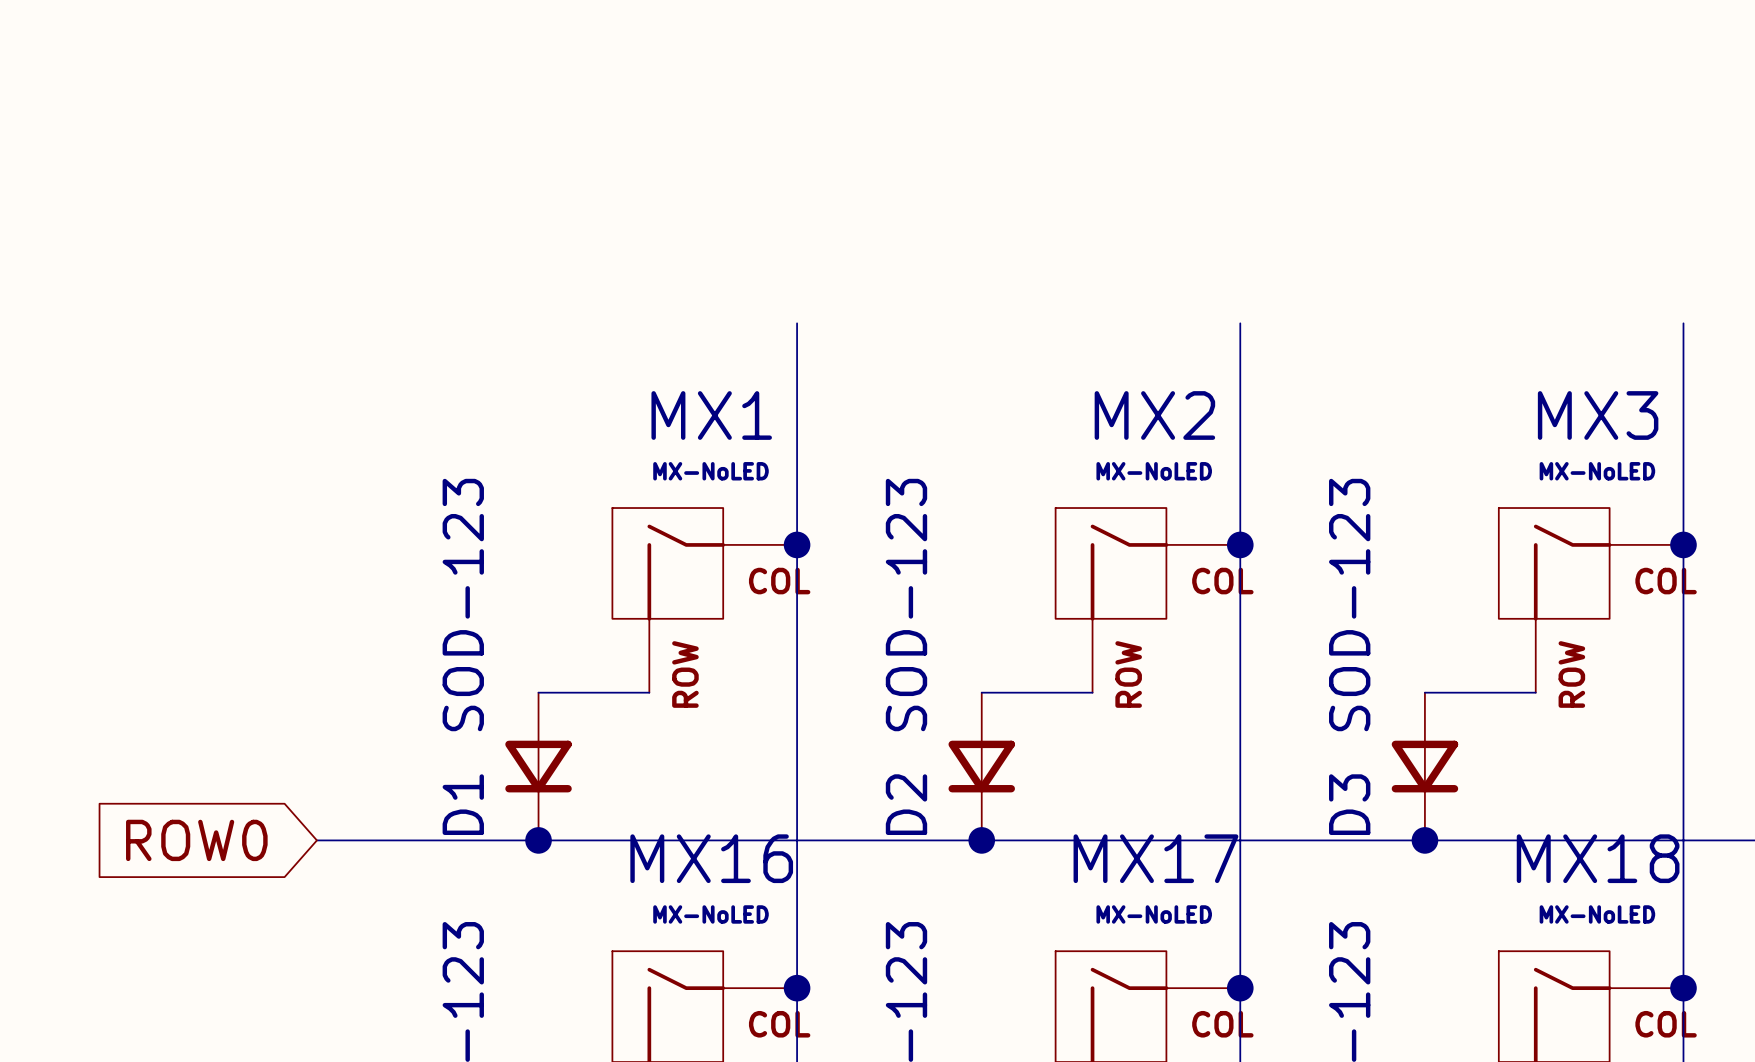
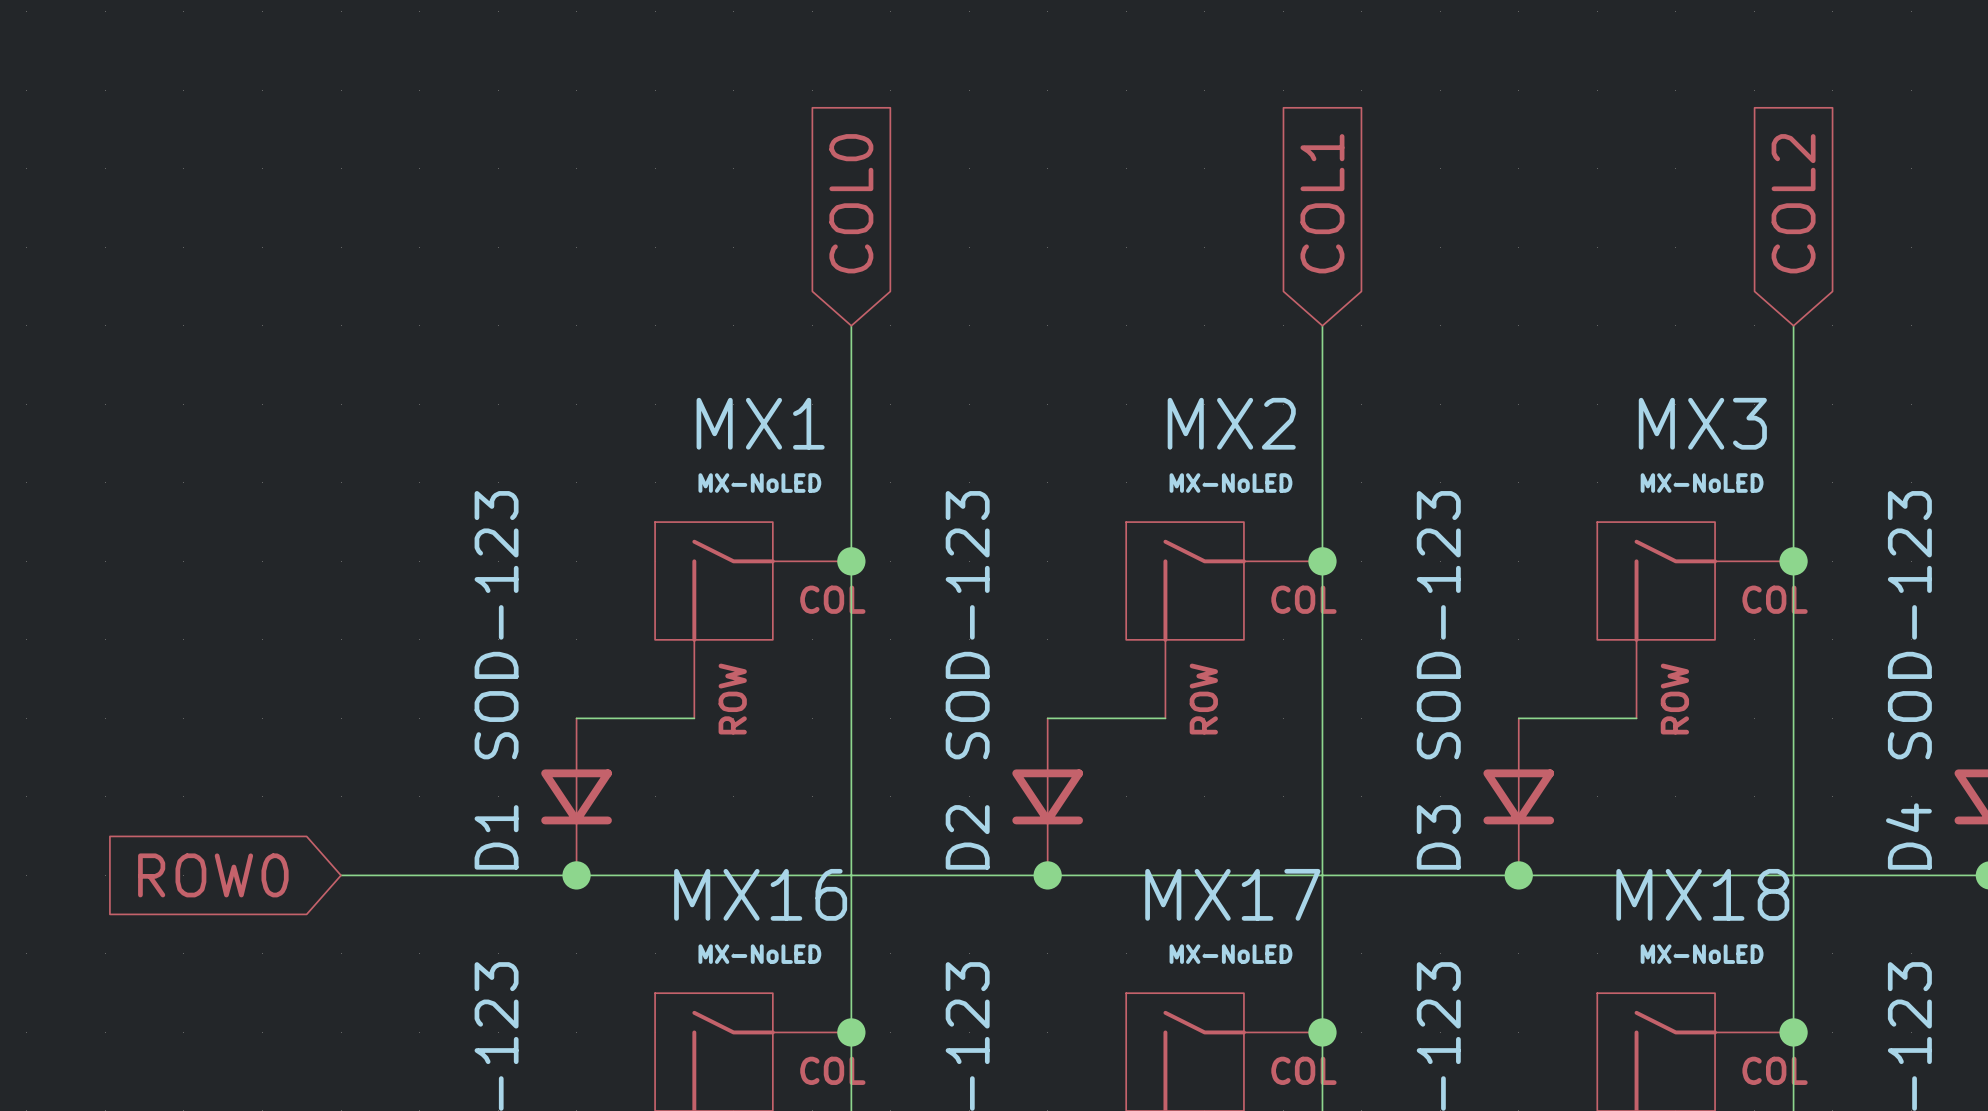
global label: none -> COL0 (851, 203)
global label: none -> COL1 (1322, 203)
global label: none -> COL2 (1793, 203)

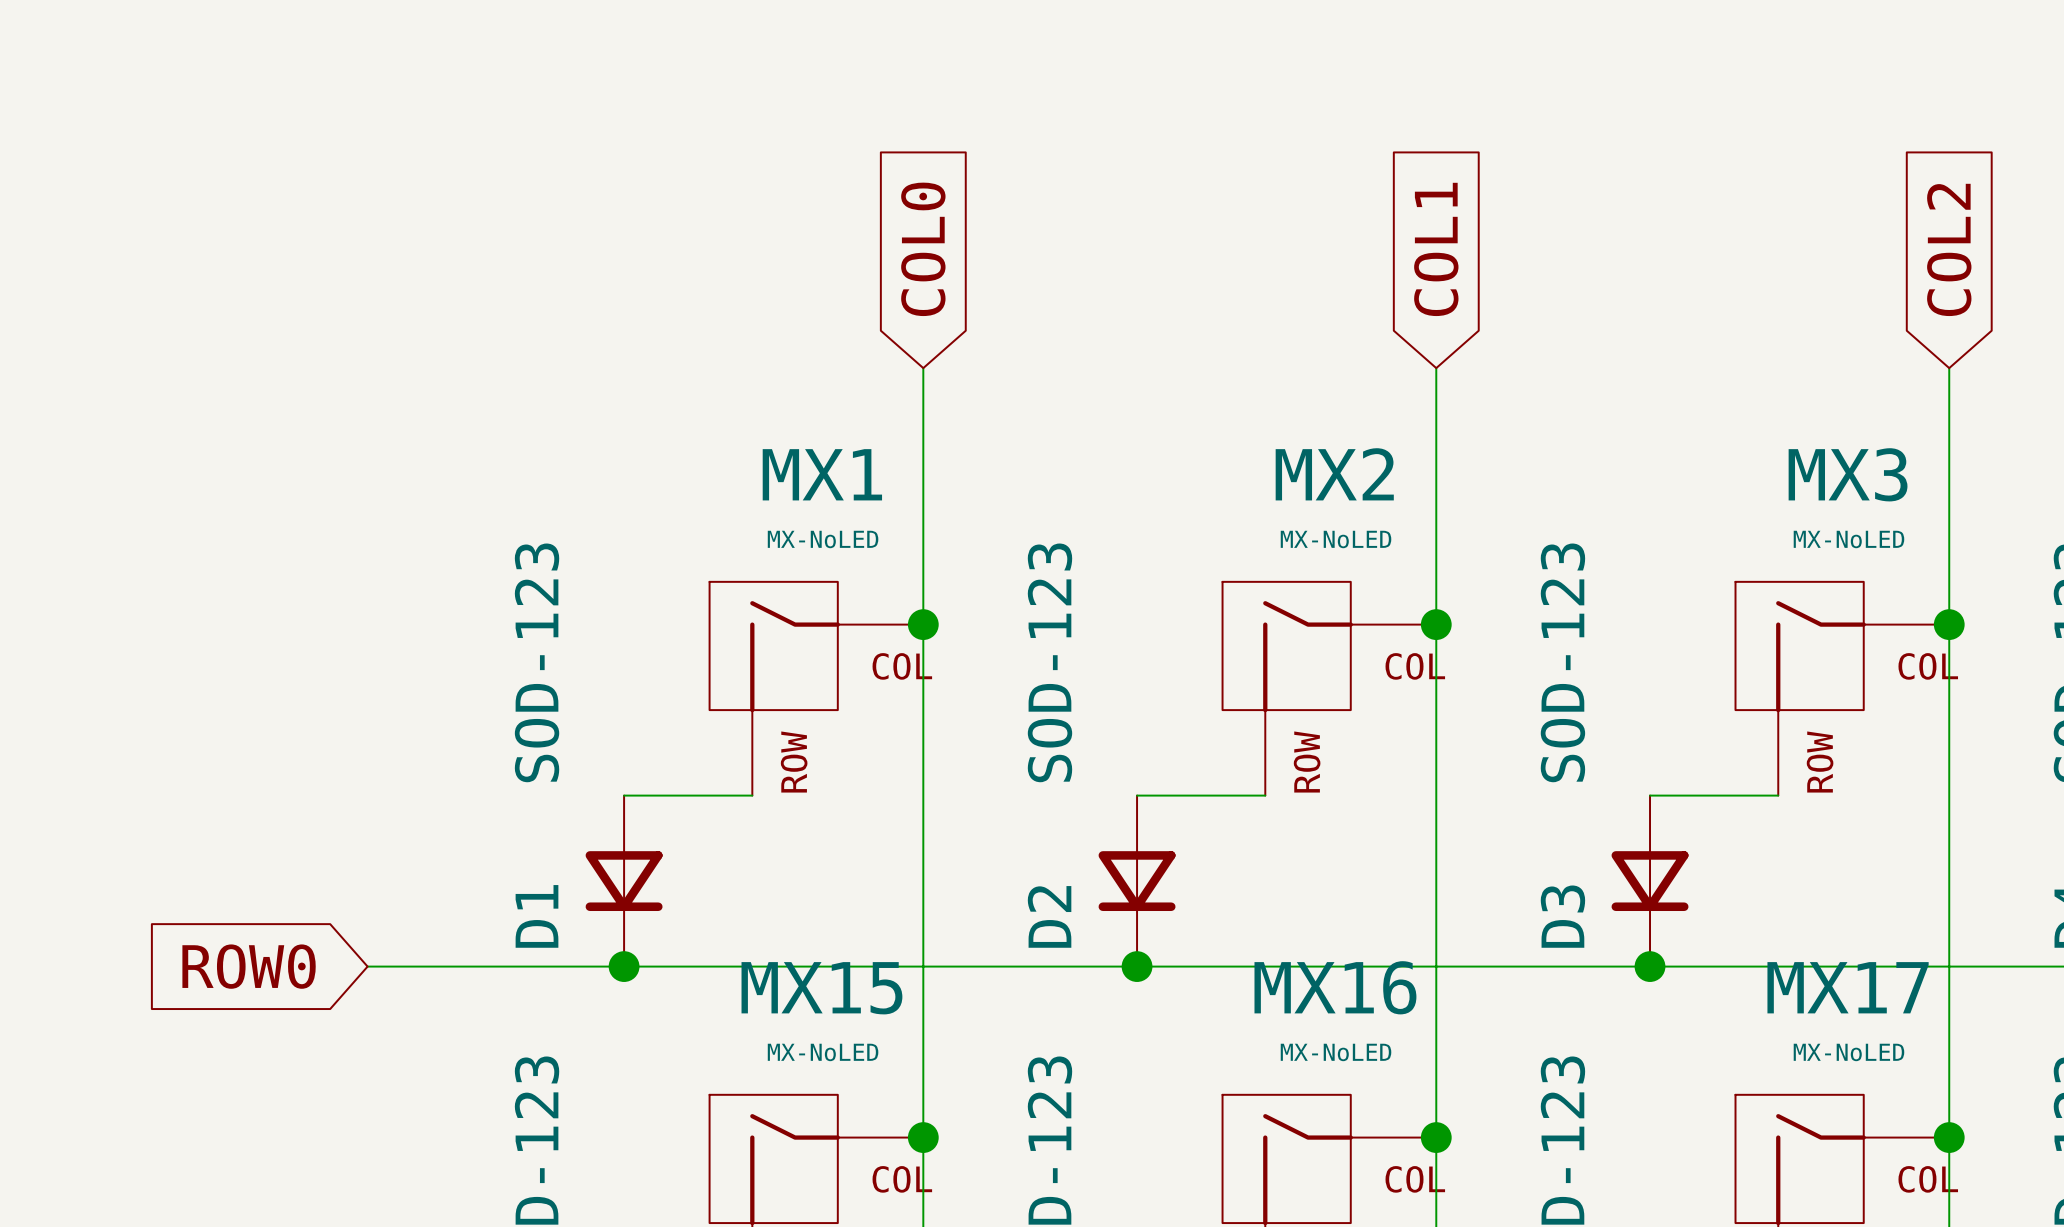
MX16 name: MX16 (760, 894) -> MX15 (821, 988)
MX17 name: MX17 (1232, 894) -> MX16 (1335, 987)
MX18 name: MX18 (1702, 894) -> MX17 (1848, 987)

